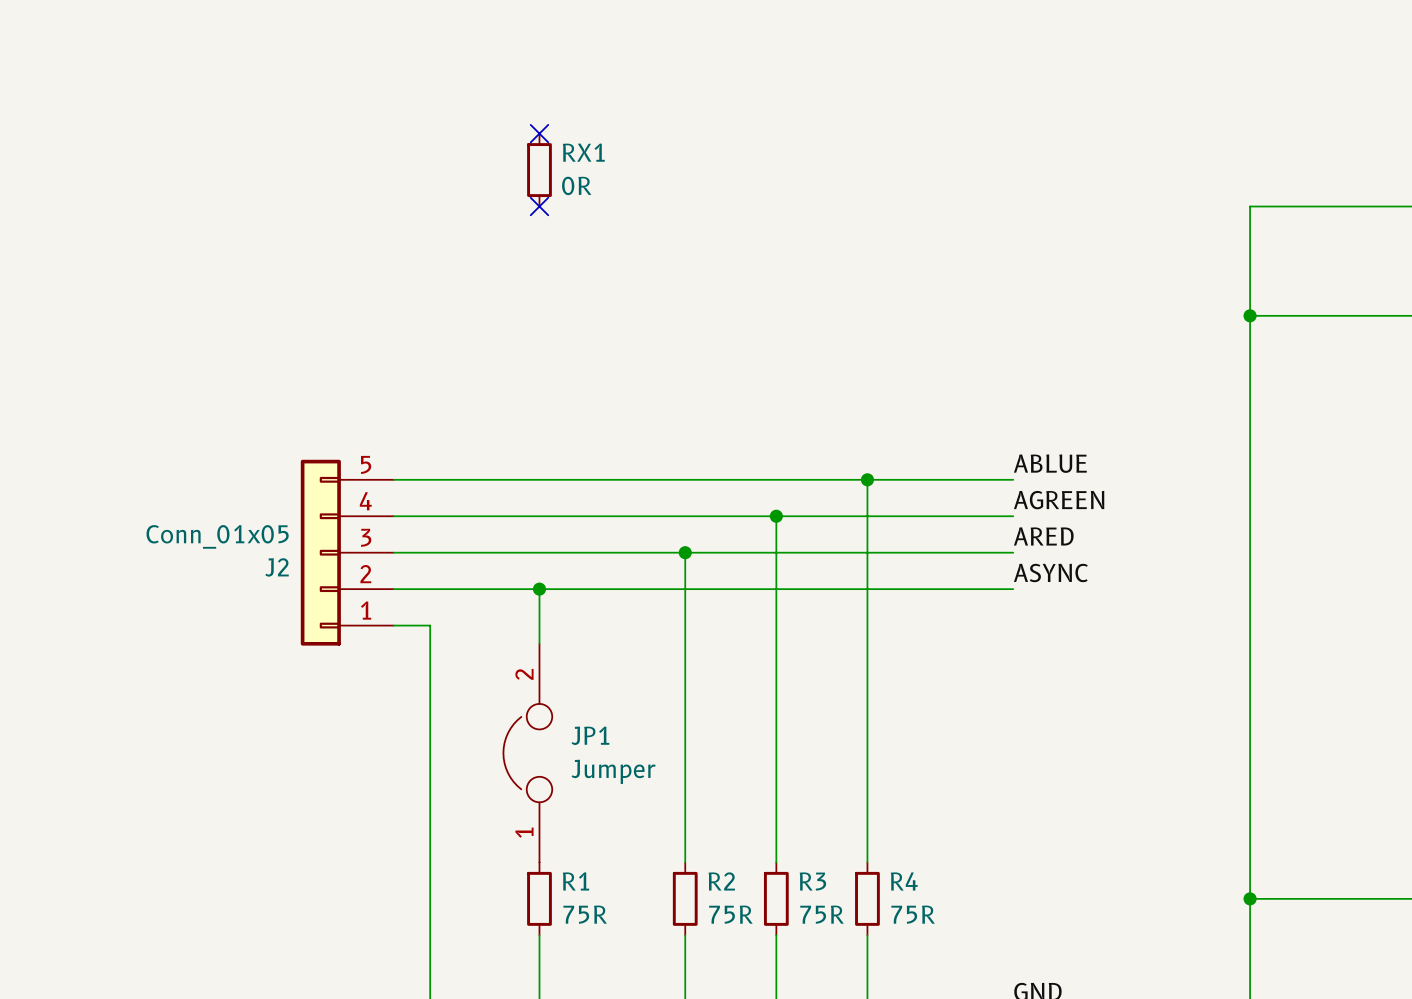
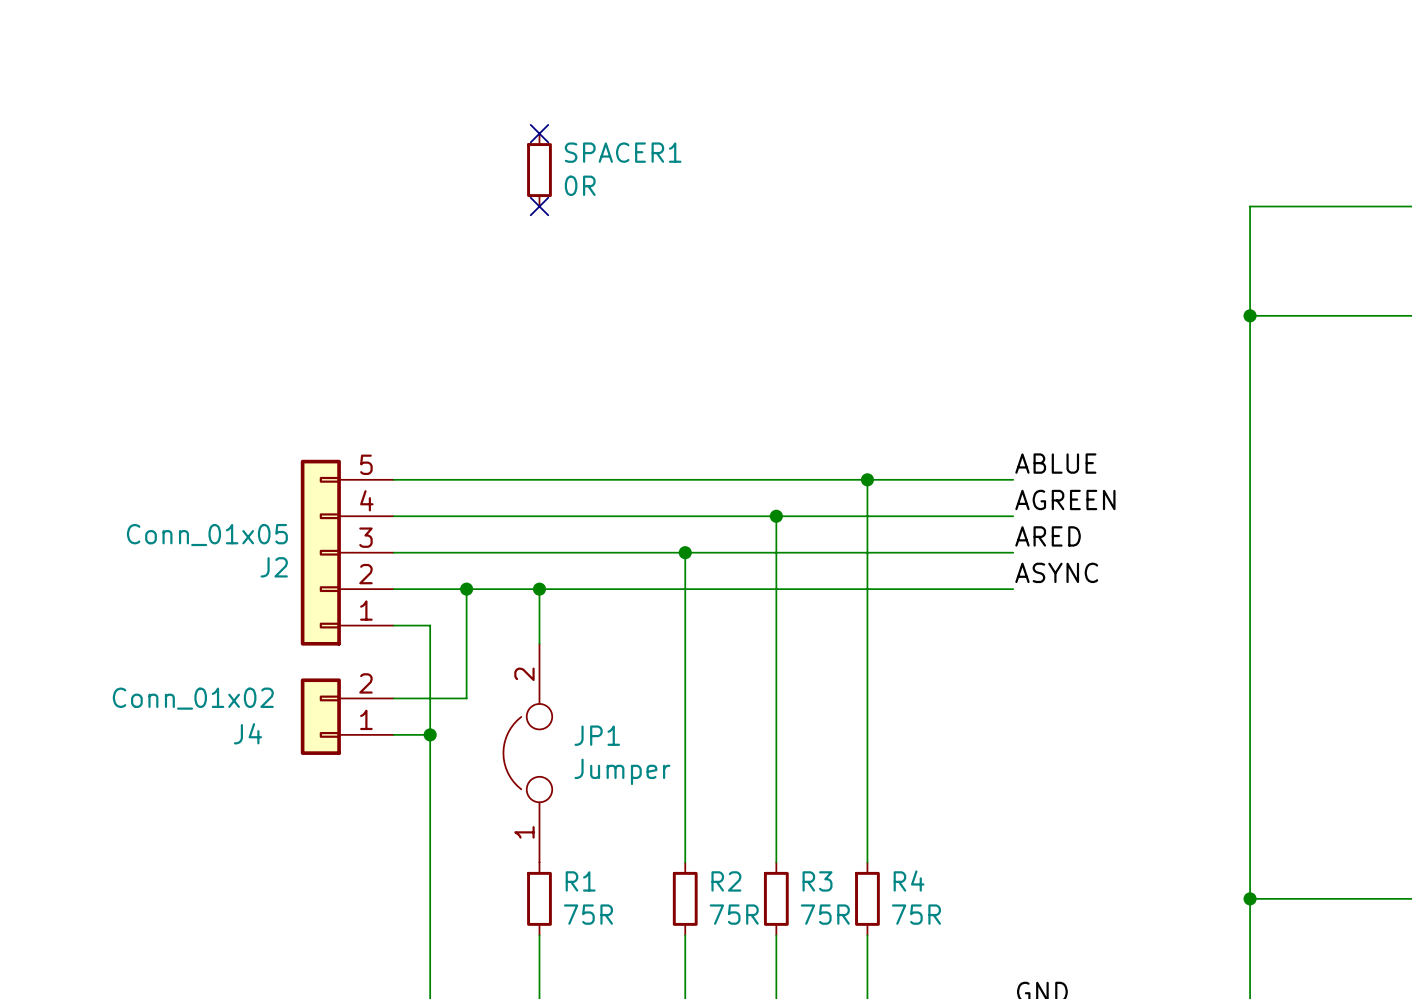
RX1 name: RX1 (583, 152) -> SPACER1 (623, 152)
wire: none -> (466, 589) (466, 698) (393, 698)
junction: none -> (466, 589)
J4: none -> Conn_01x02 (347, 716)
wire: none -> (393, 734) (430, 734)
junction: none -> (430, 734)

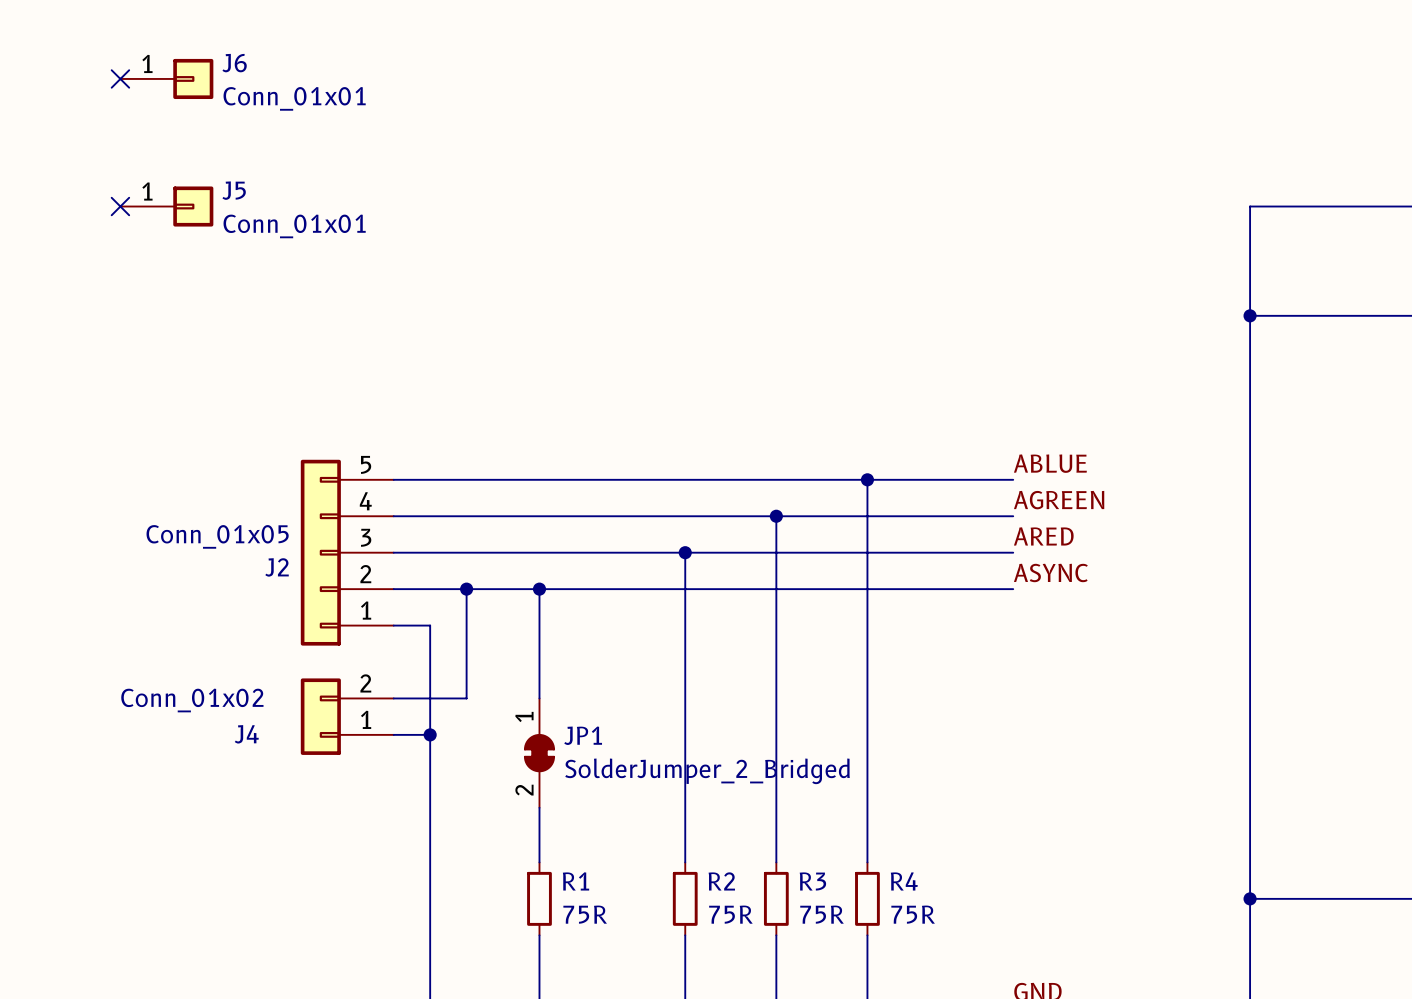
no-connect mark: none -> (120, 78)
J6: none -> Conn_01x01 (166, 78)
no-connect mark: (539, 133) -> none
SPACER1: 0R (539, 170) -> none
no-connect mark: none -> (120, 206)
J5: none -> Conn_01x01 (166, 206)
no-connect mark: (539, 206) -> none
JP1 symbol: [503, 643, 553, 863] -> [524, 698, 555, 808]
JP1 value: Jumper (622, 771) -> SolderJumper_2_Bridged (707, 771)

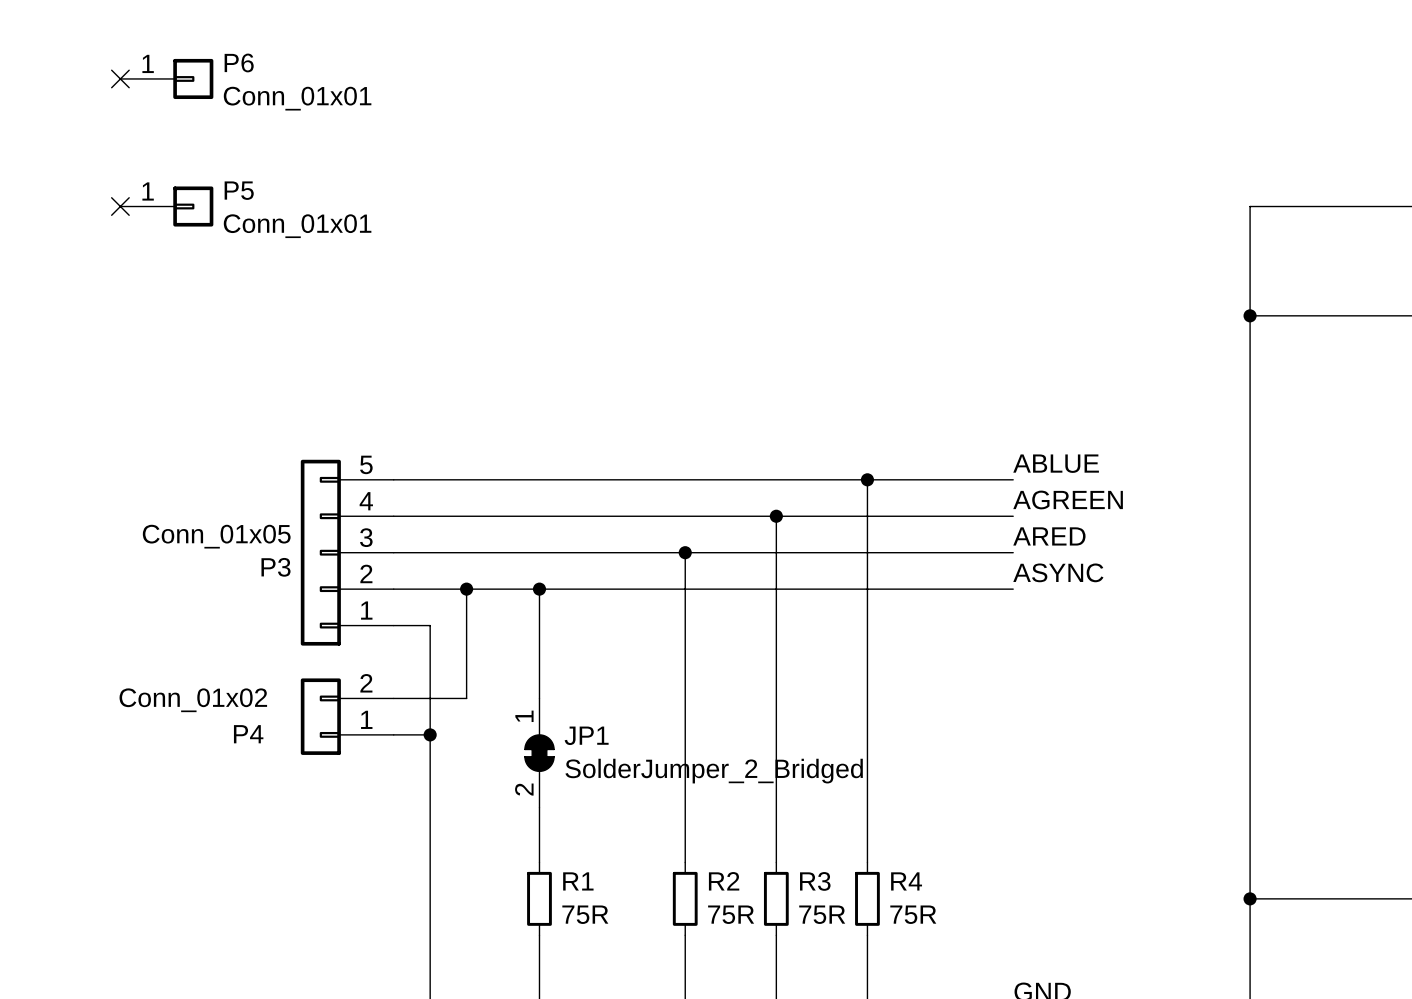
J6 name: J6 (234, 63) -> P6 (239, 62)
J5 name: J5 (234, 190) -> P5 (239, 190)
J2 name: J2 (277, 567) -> P3 (276, 567)
J4 name: J4 (246, 734) -> P4 (248, 734)

